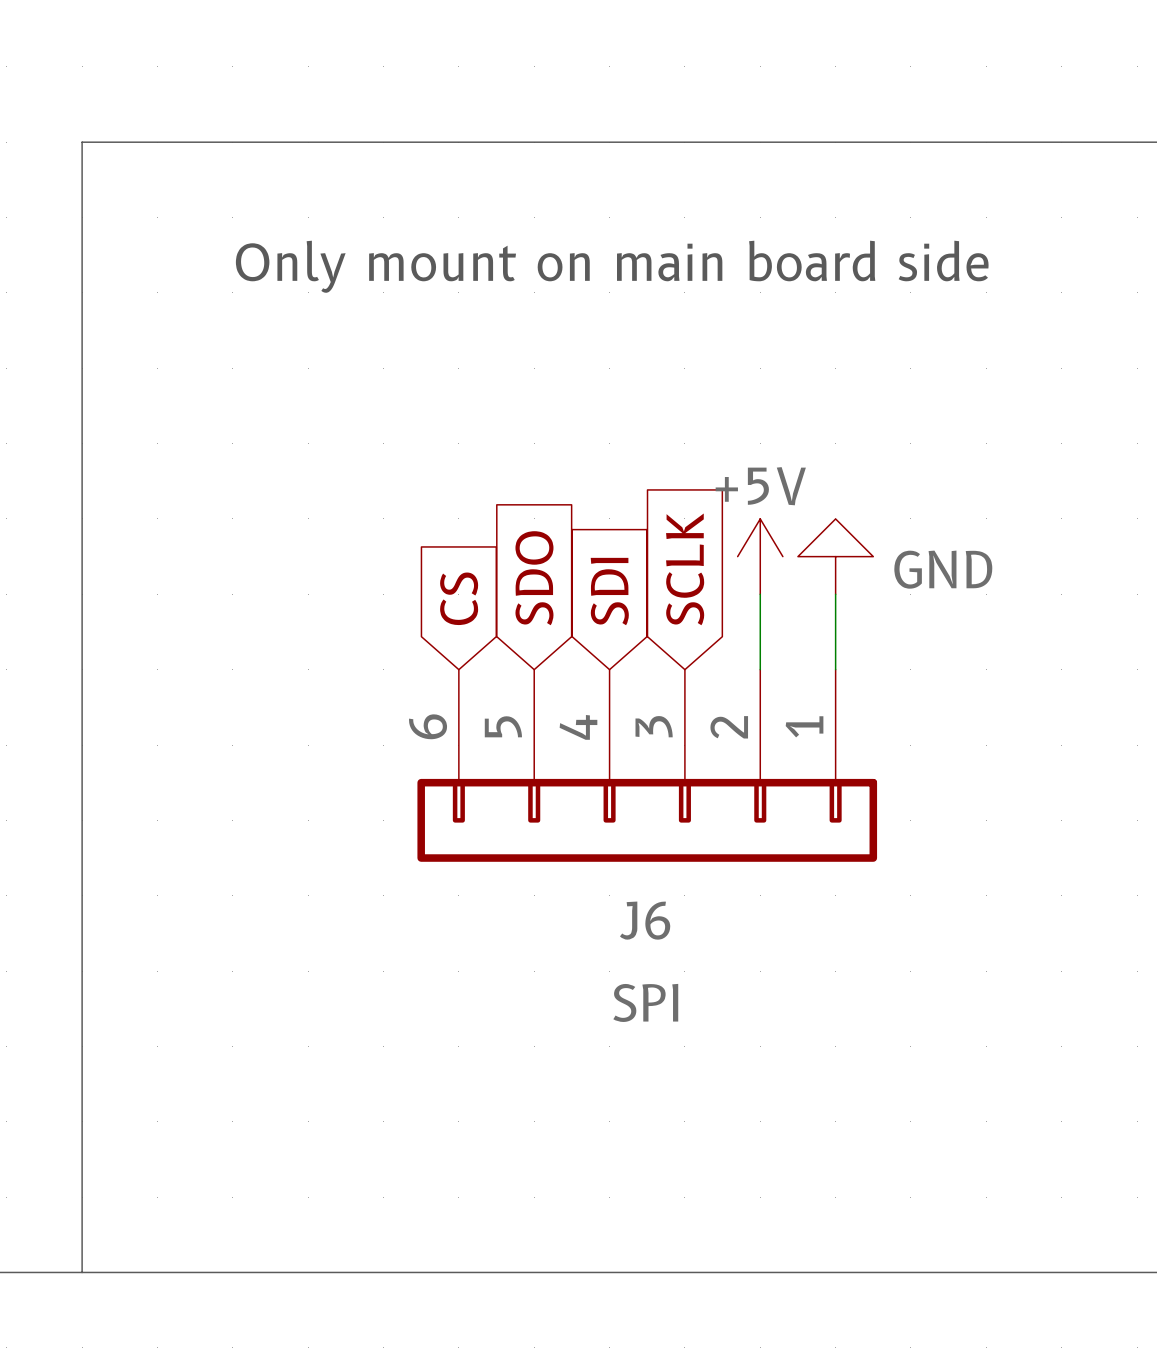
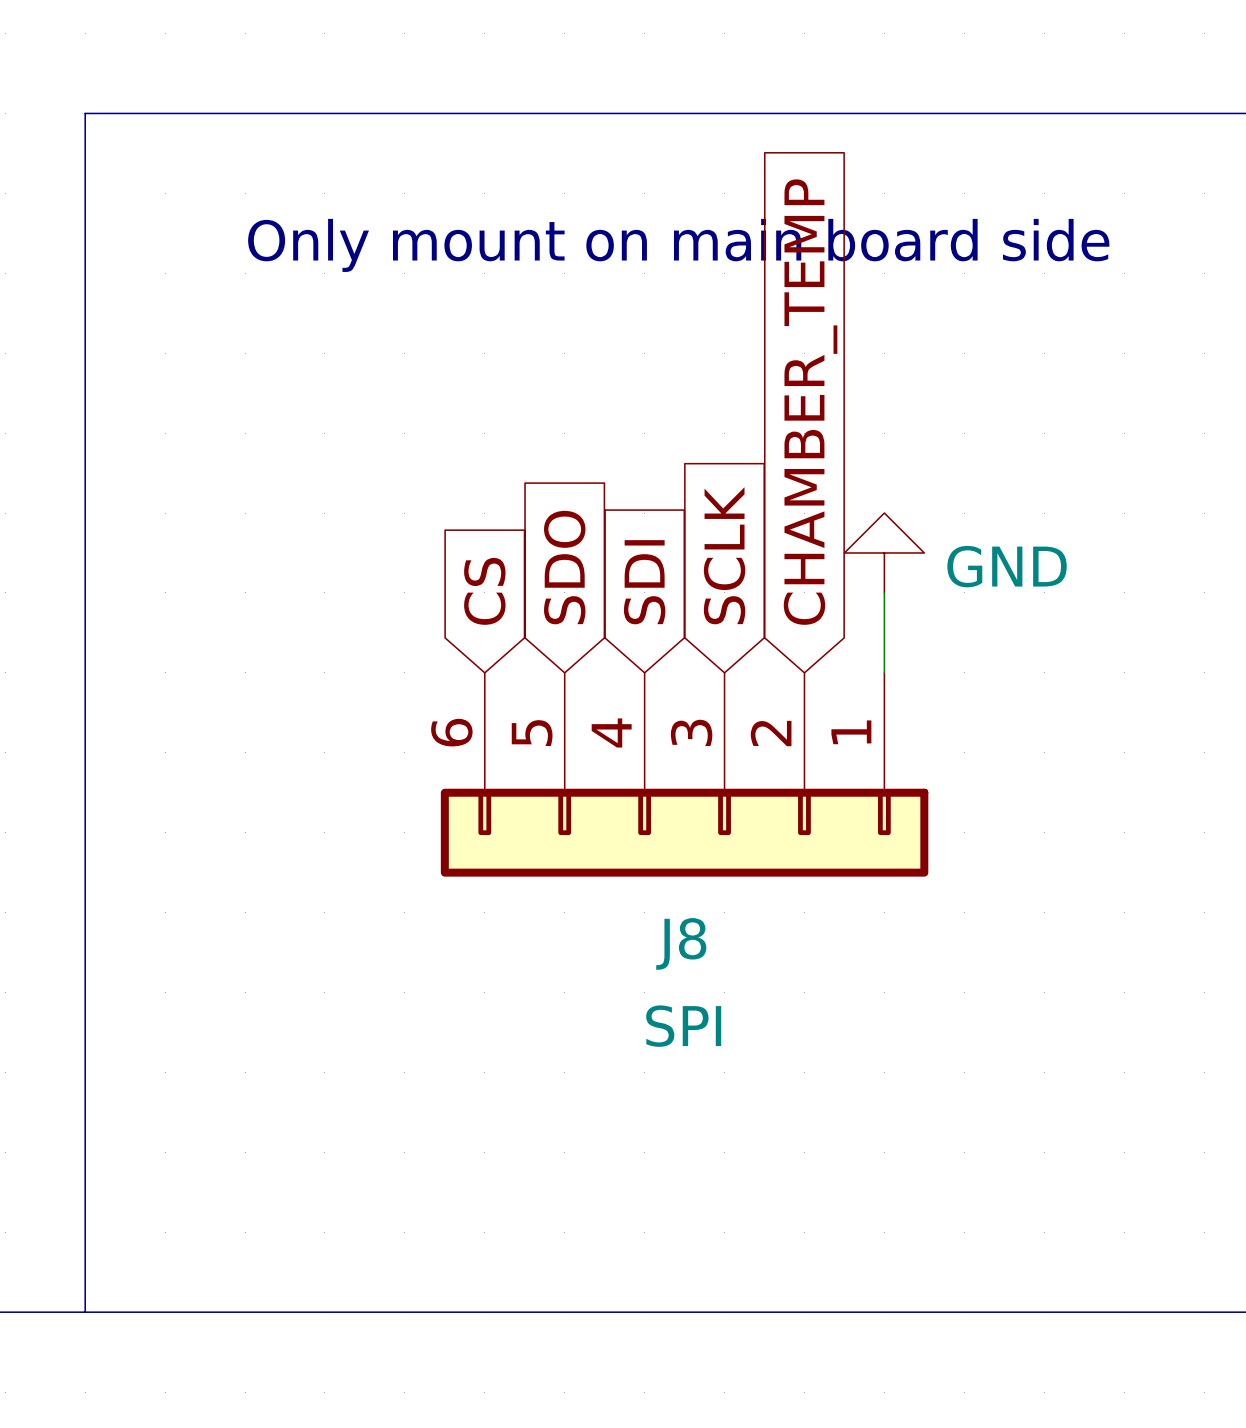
global label: none -> CHAMBER_TEMP (810, 402)
power symbol: +5V (760, 556) -> none
wire: (760, 594) (760, 669) -> none
J6 name: J6 (645, 920) -> J8 (681, 943)

